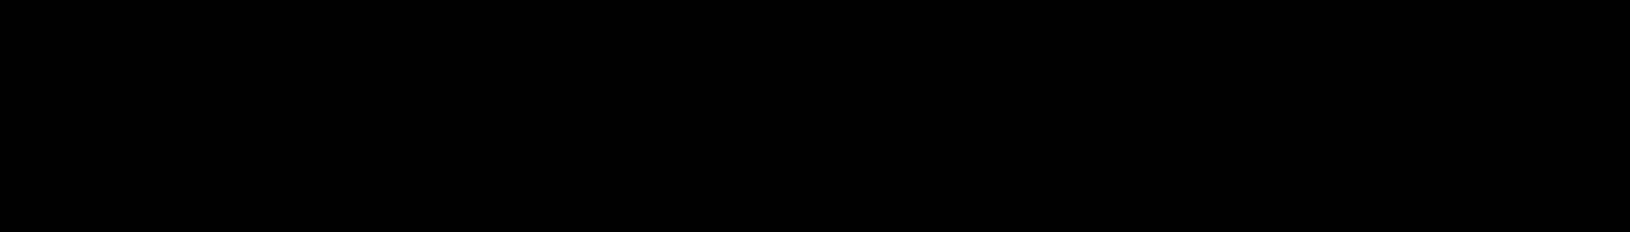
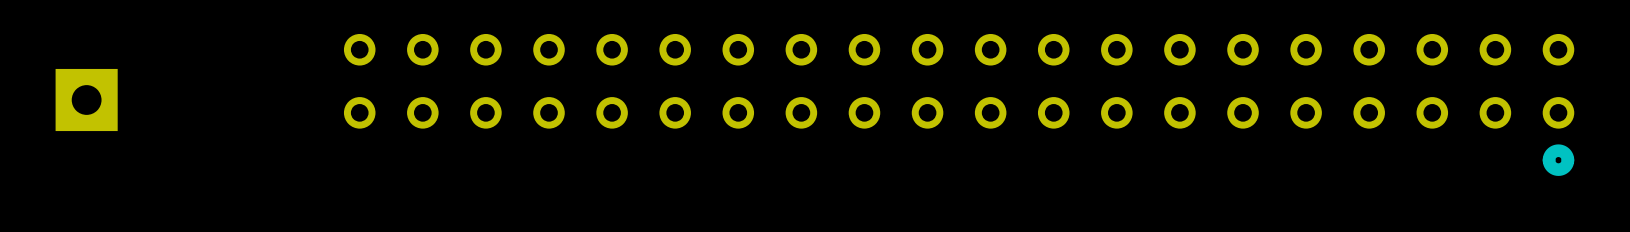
part: none -> (86, 100)
part: none -> (959, 104)

